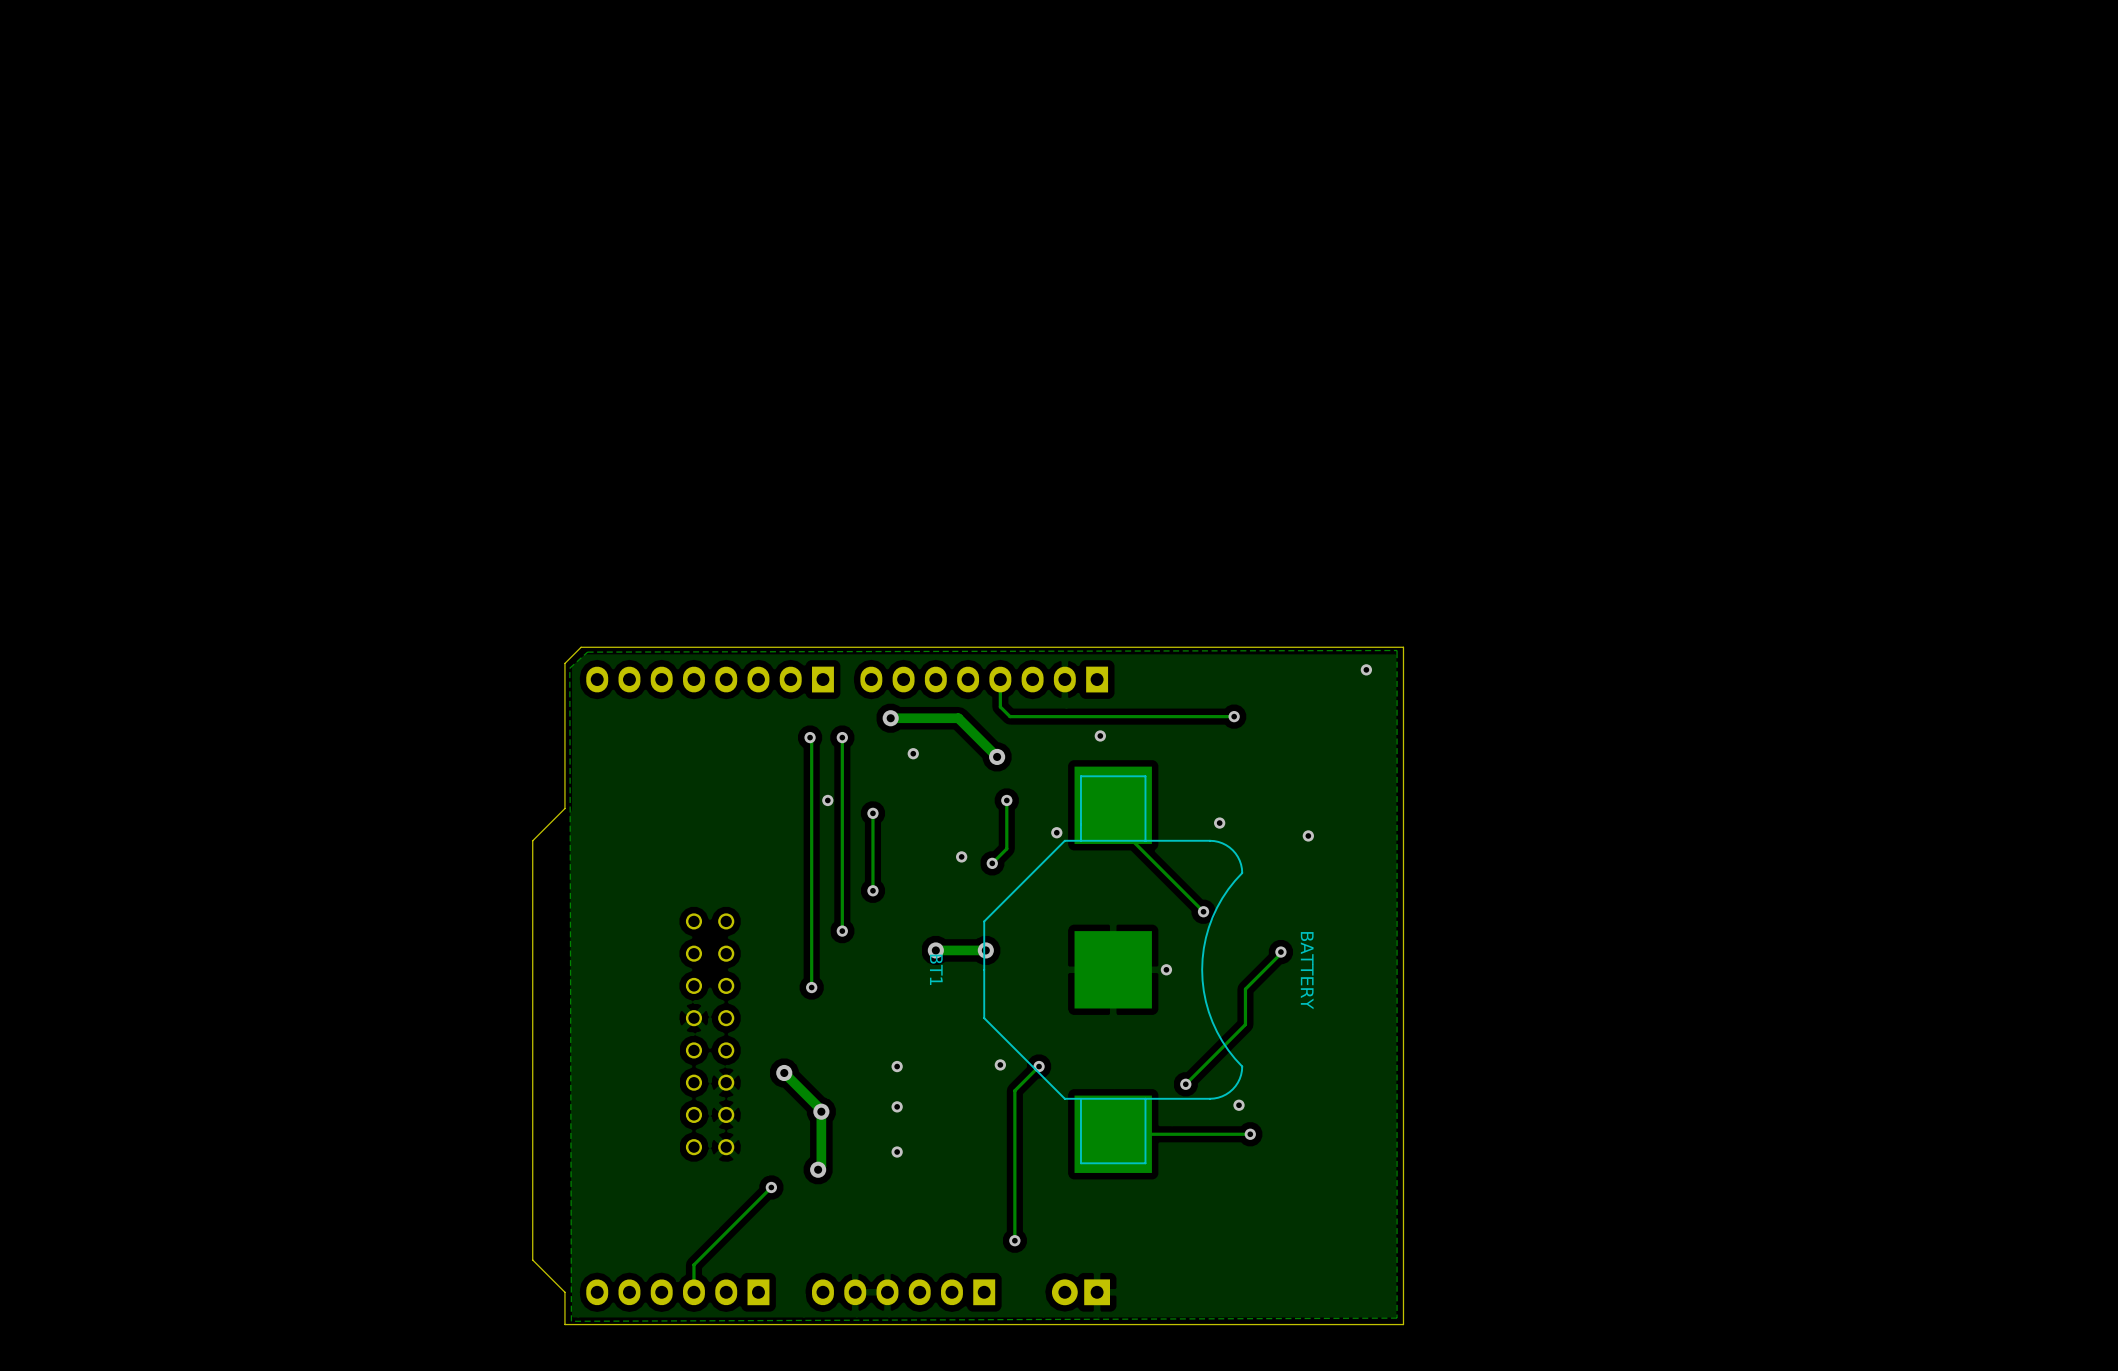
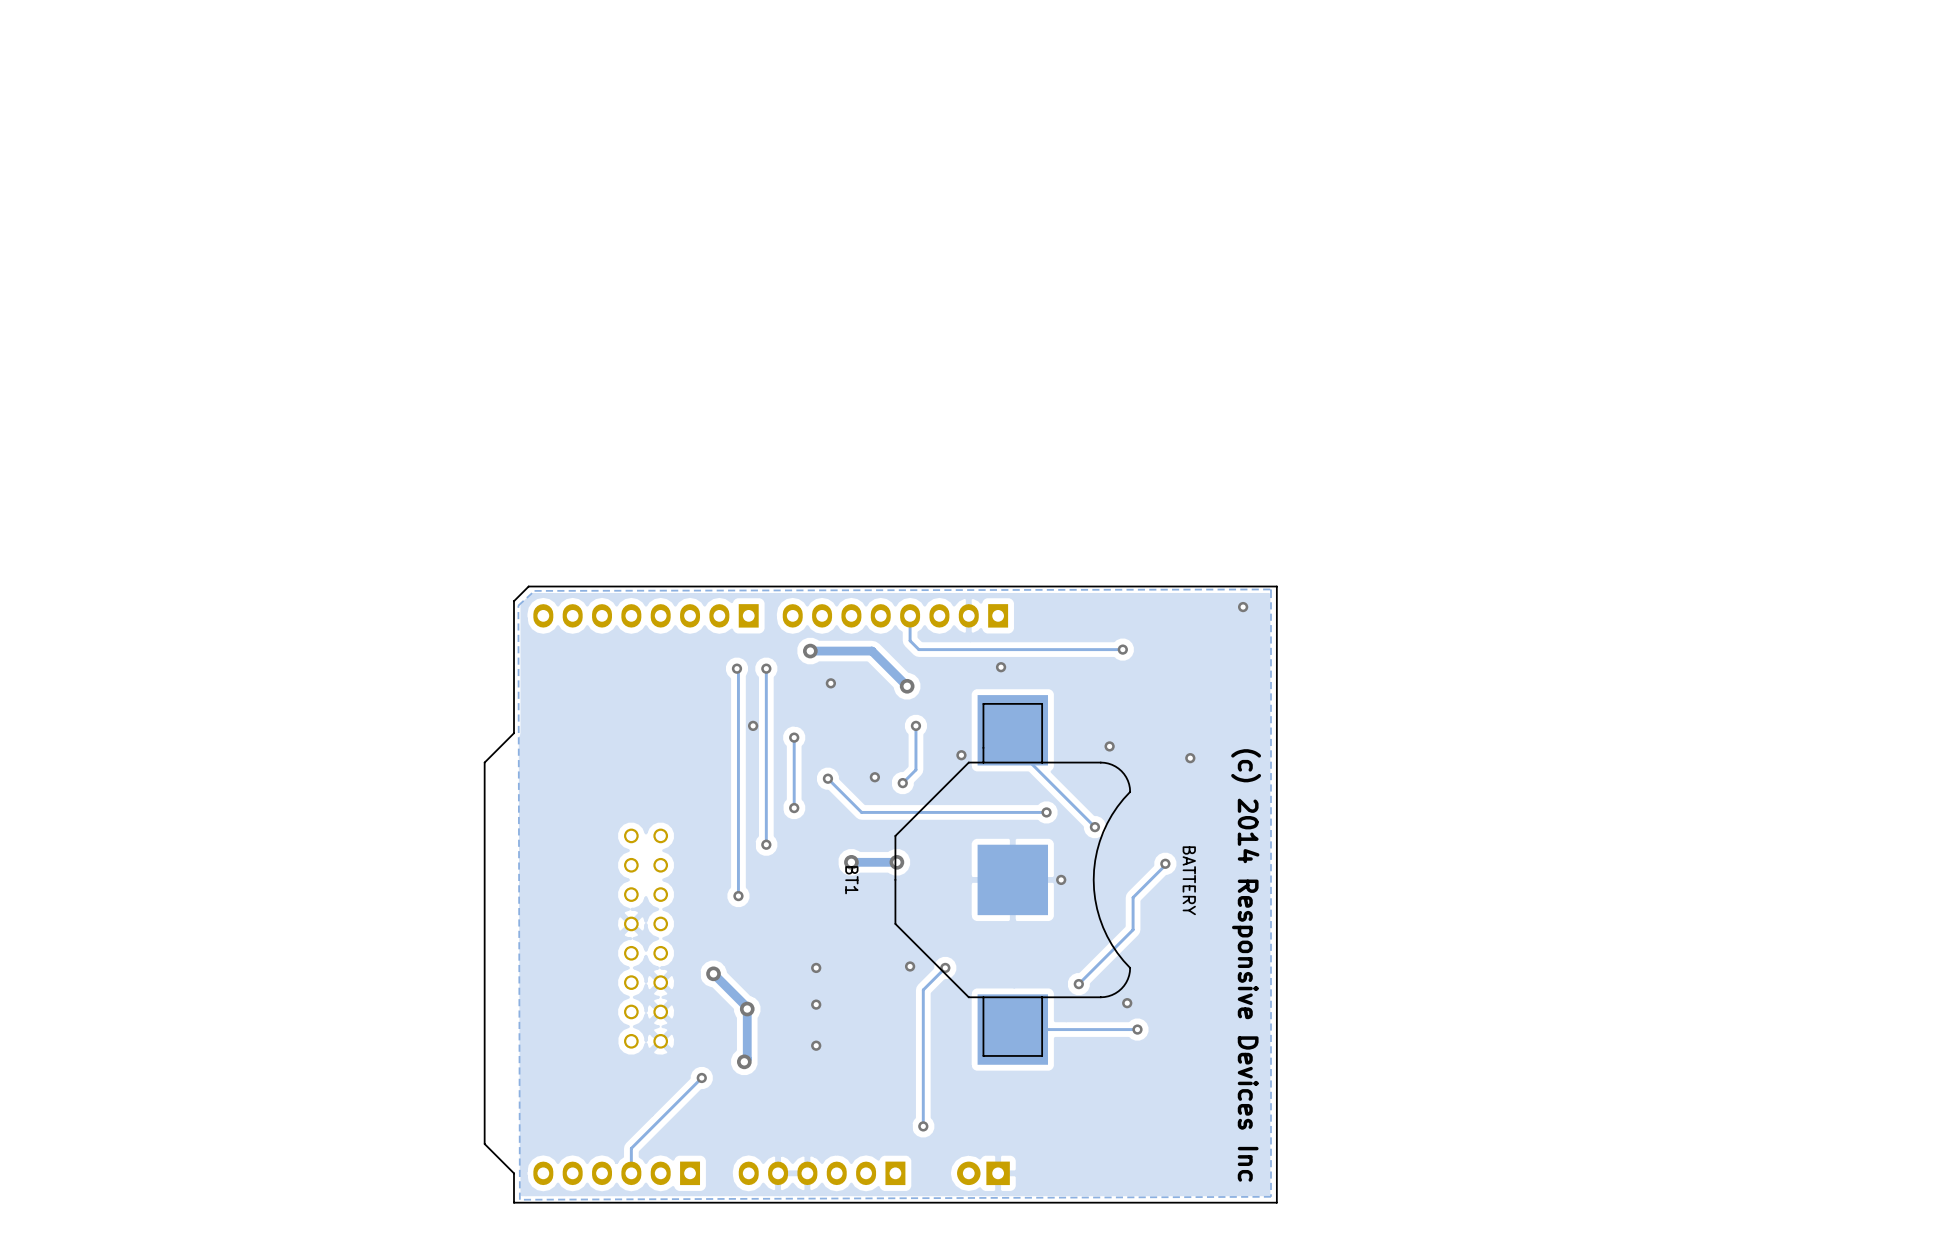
track: none -> (827, 778) (861, 812) (1046, 812)
via: none -> (827, 778)
via: none -> (1046, 812)
text: none -> (c) 2014 Responsive Devices Inc (1246, 965)

